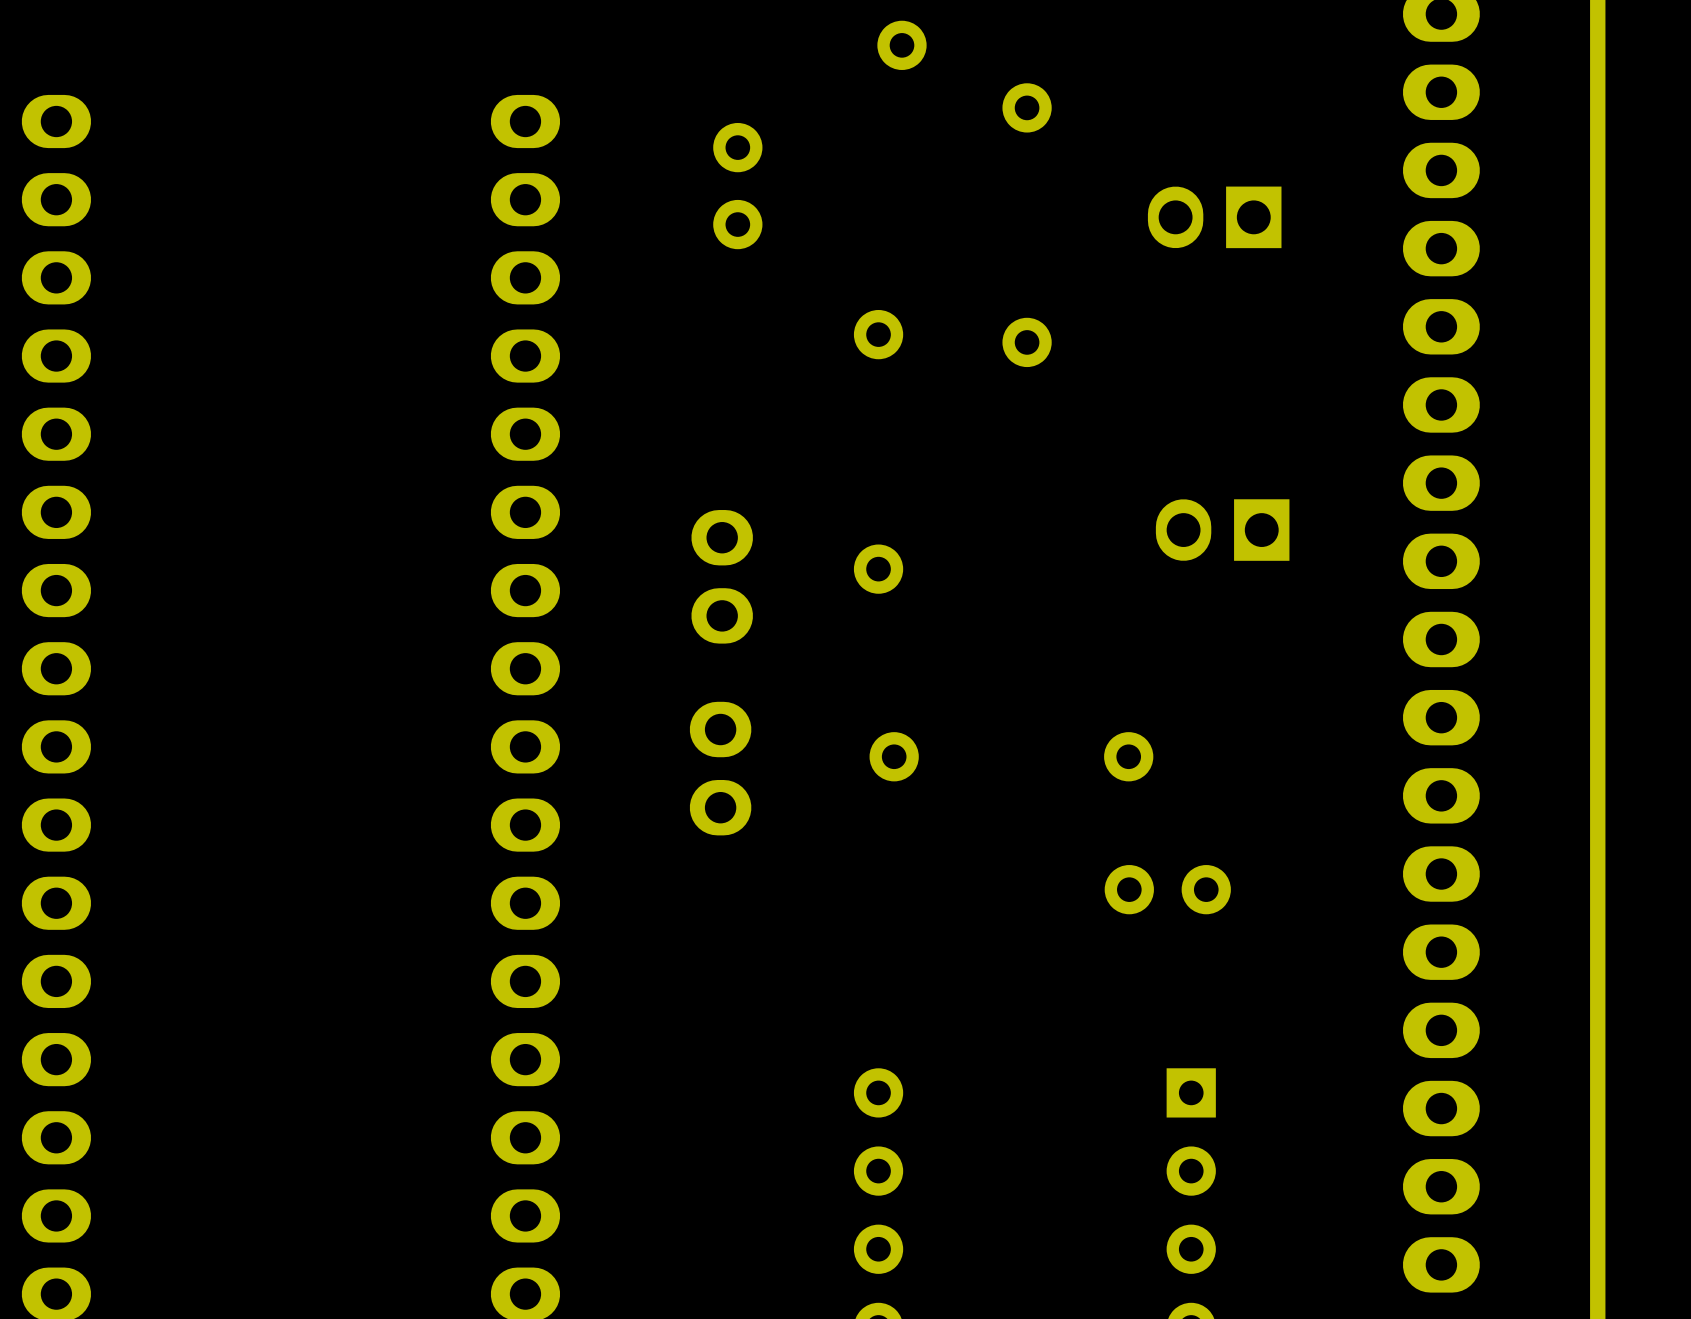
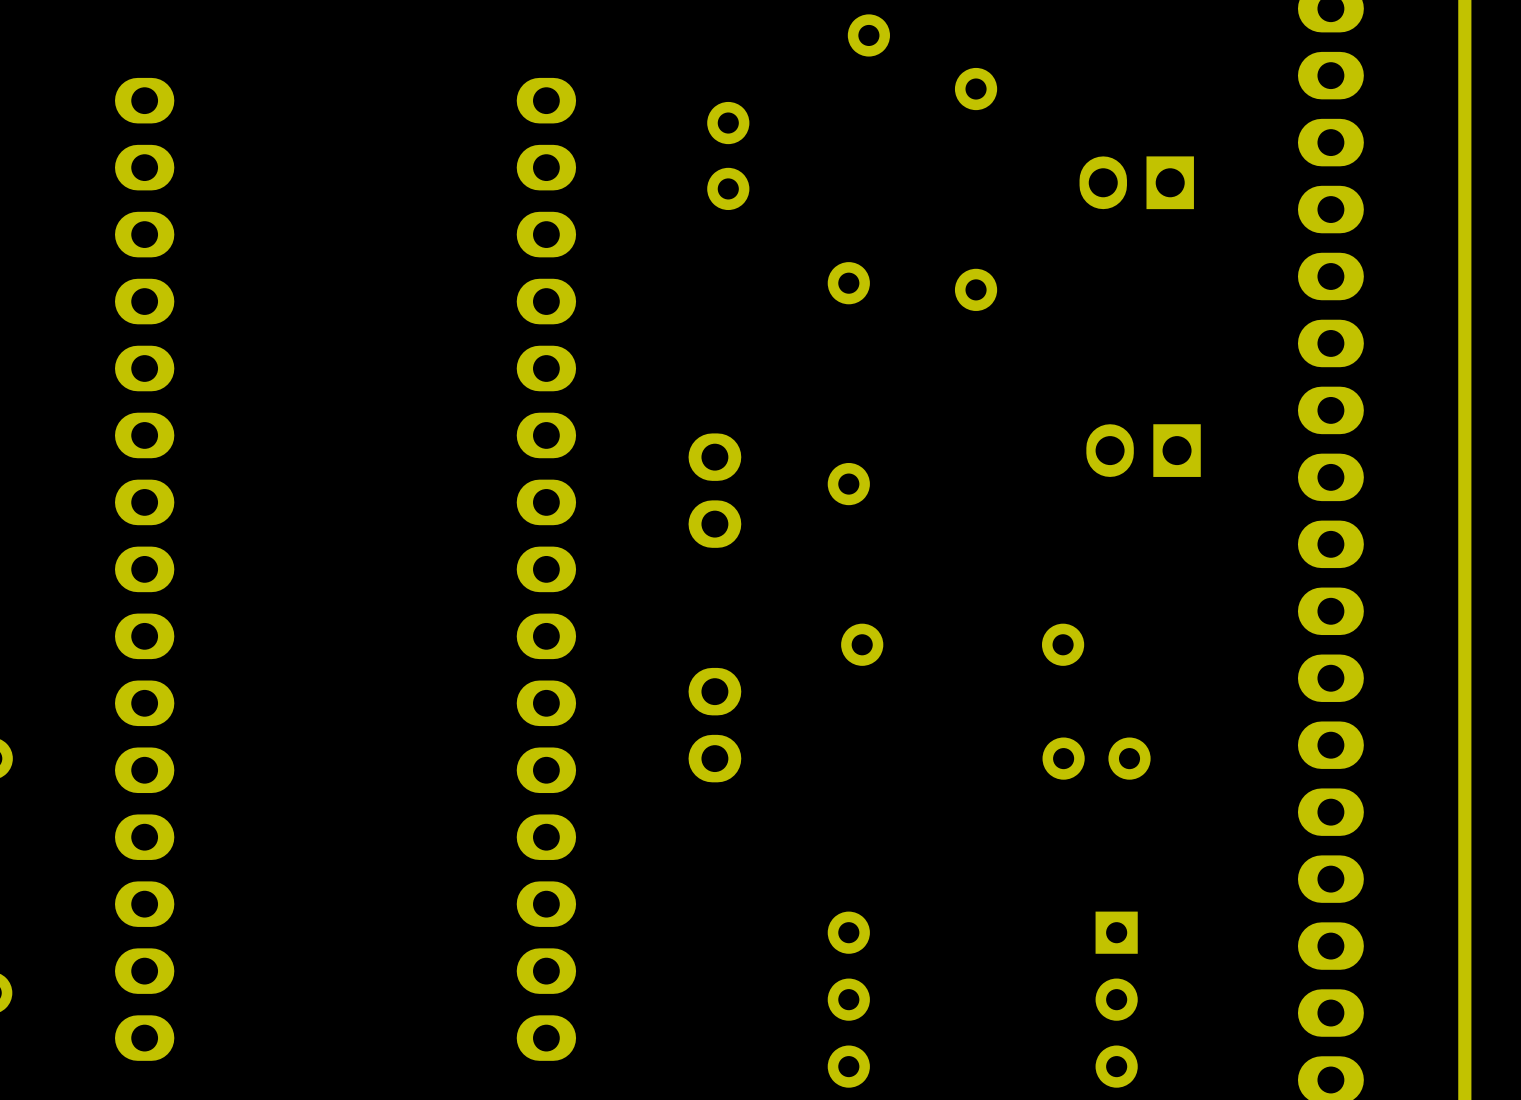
part position: (720, 768) -> (714, 725)

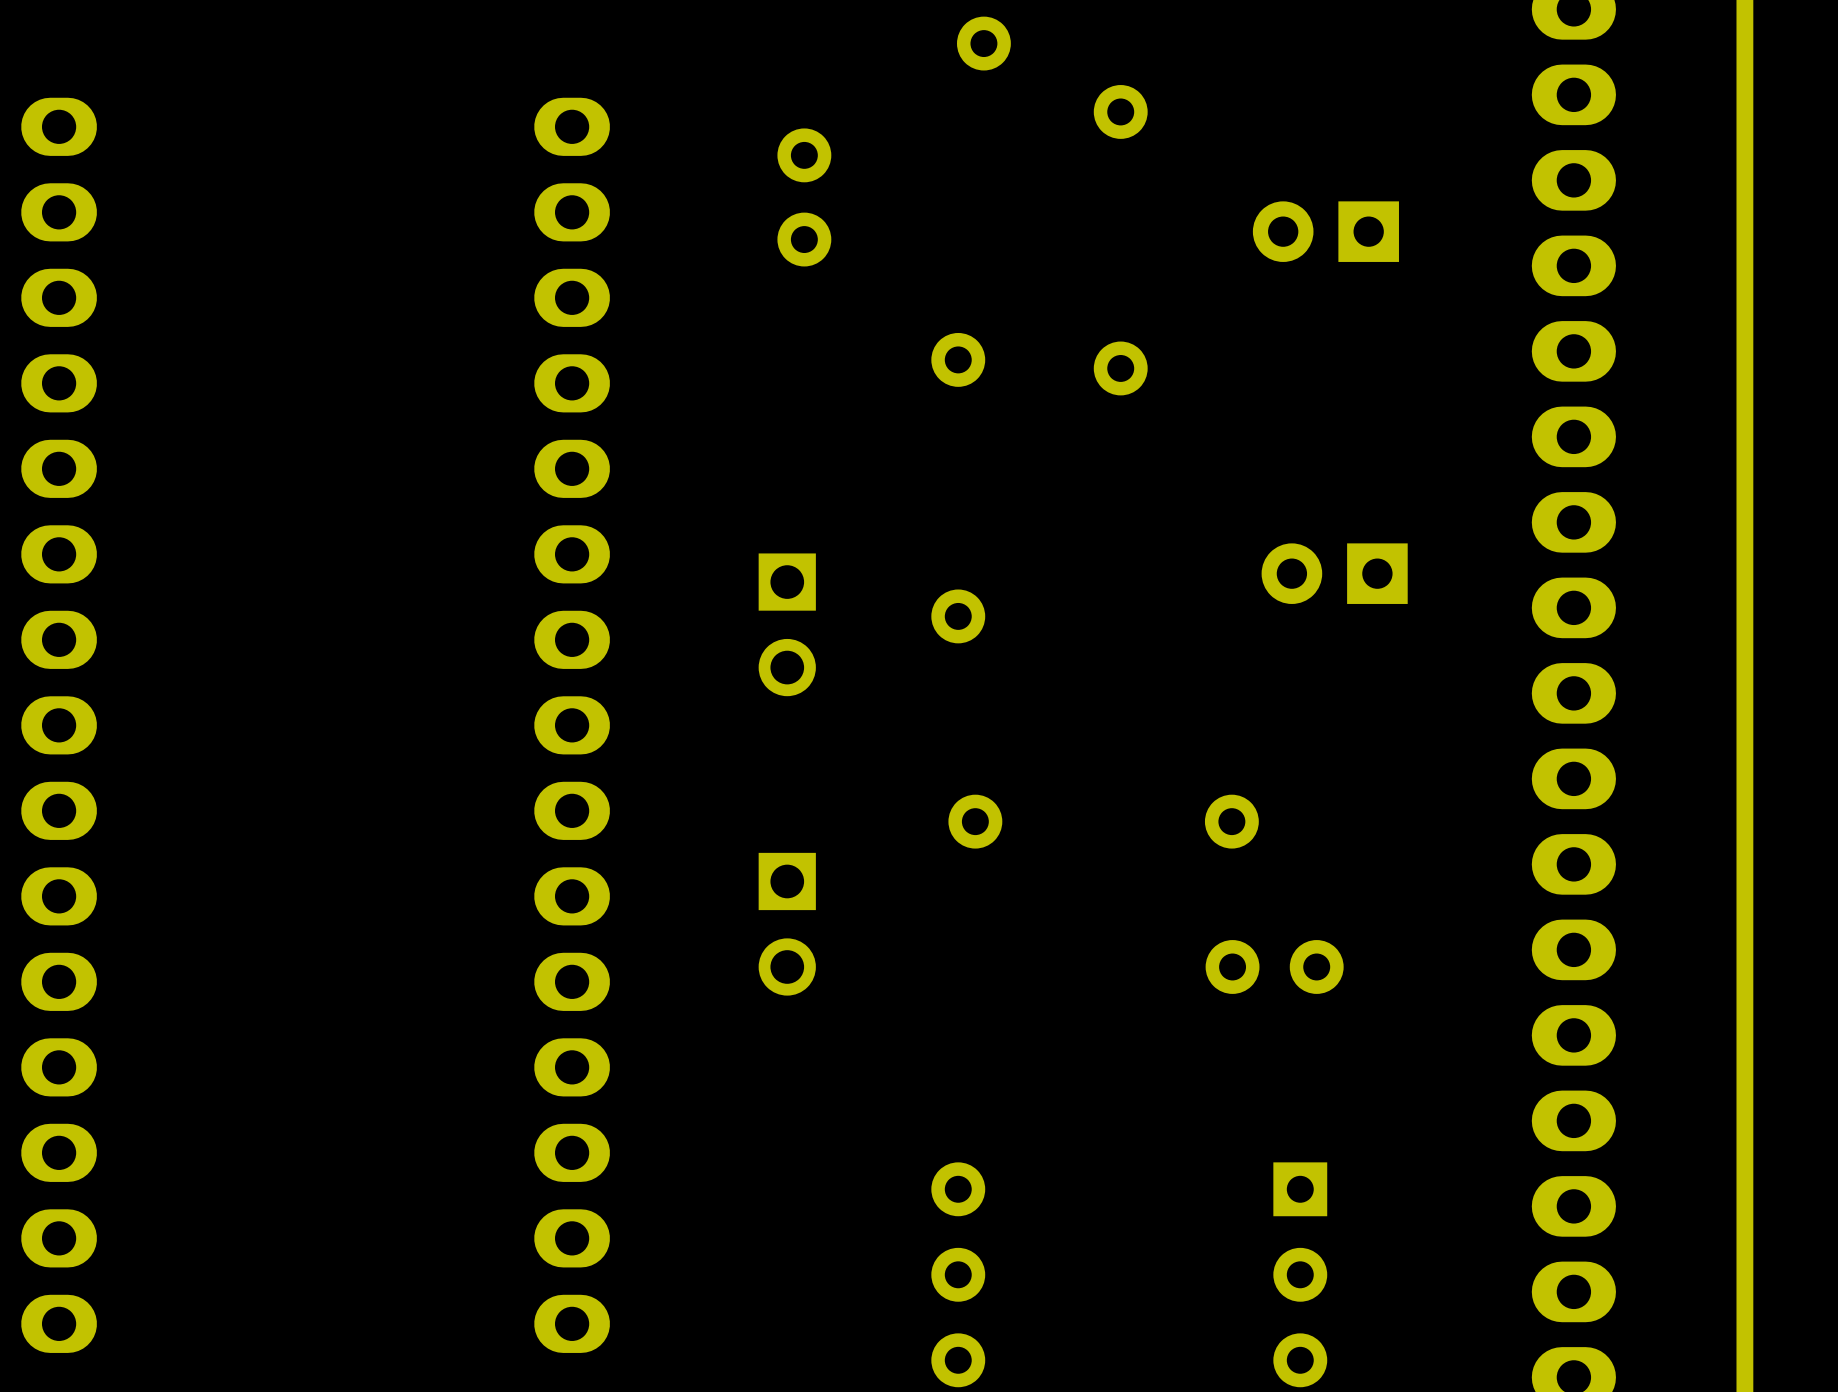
part footprint: [1079, 156, 1194, 210] -> [1252, 201, 1399, 262]
part footprint: [1086, 424, 1201, 477] -> [1261, 543, 1408, 604]
part footprint: [688, 433, 742, 548] -> [758, 553, 816, 697]
part footprint: [688, 667, 742, 783] -> [758, 852, 816, 996]

